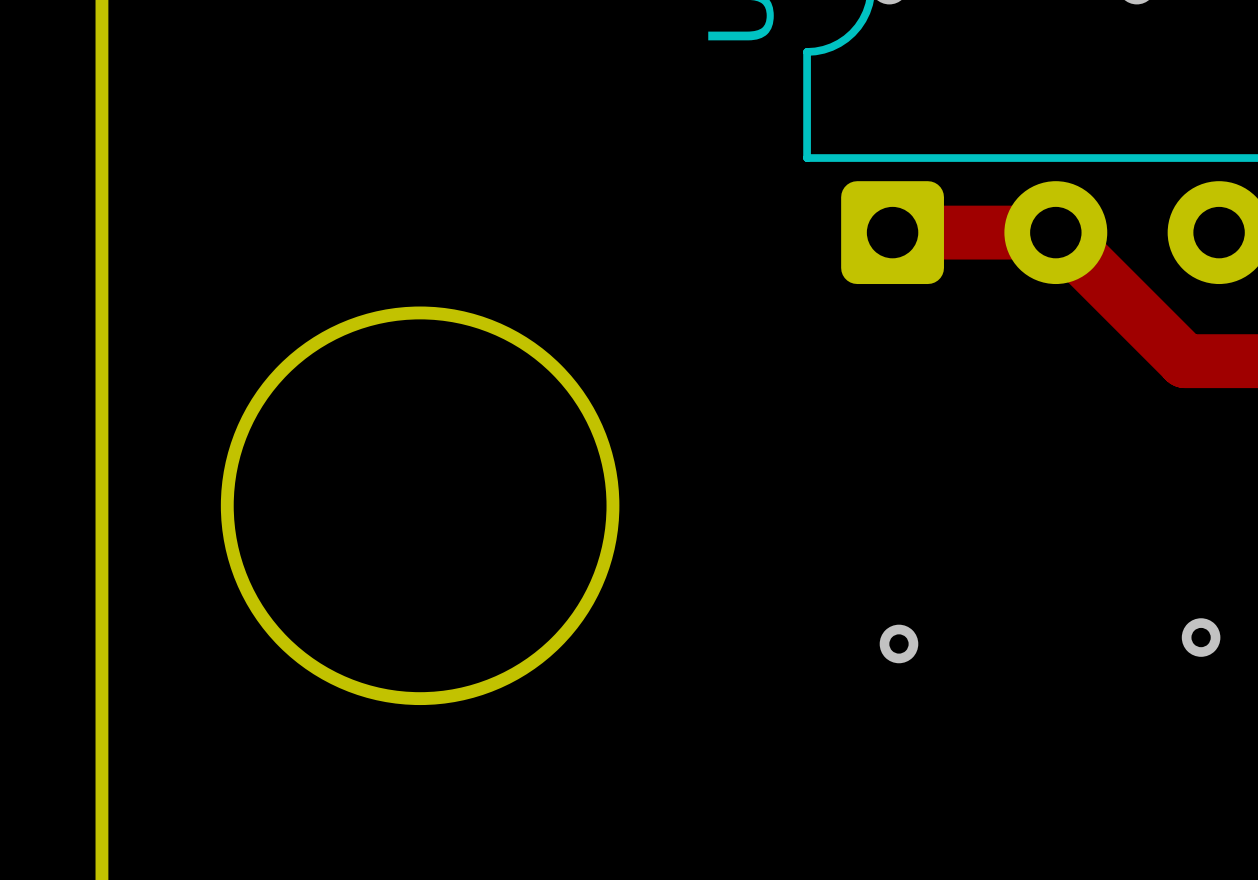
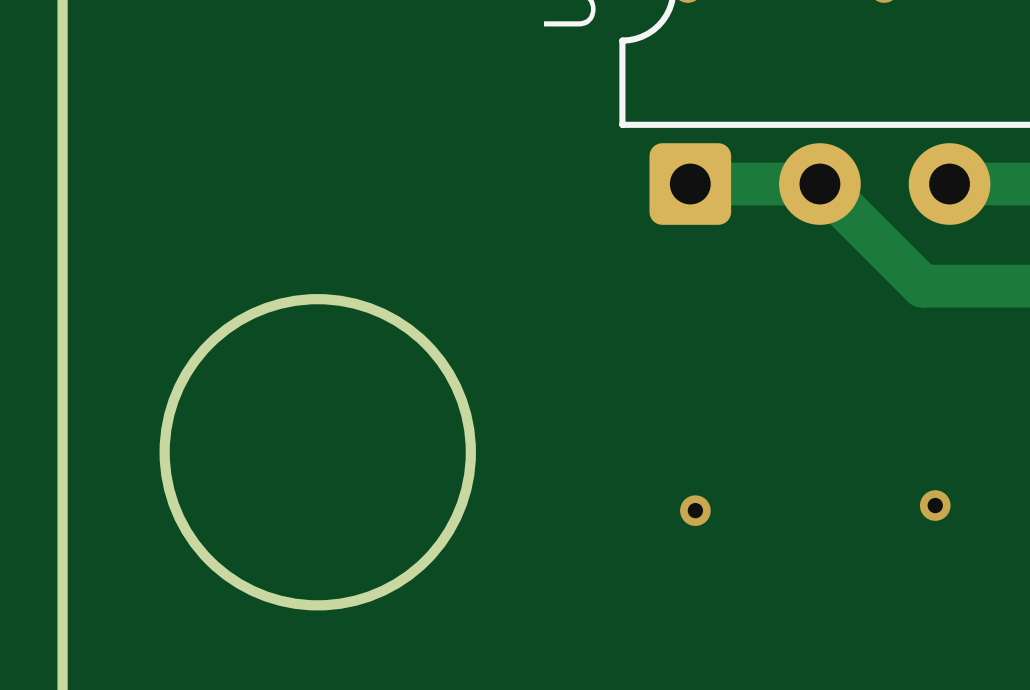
round board edge position: (420, 505) -> (317, 452)

